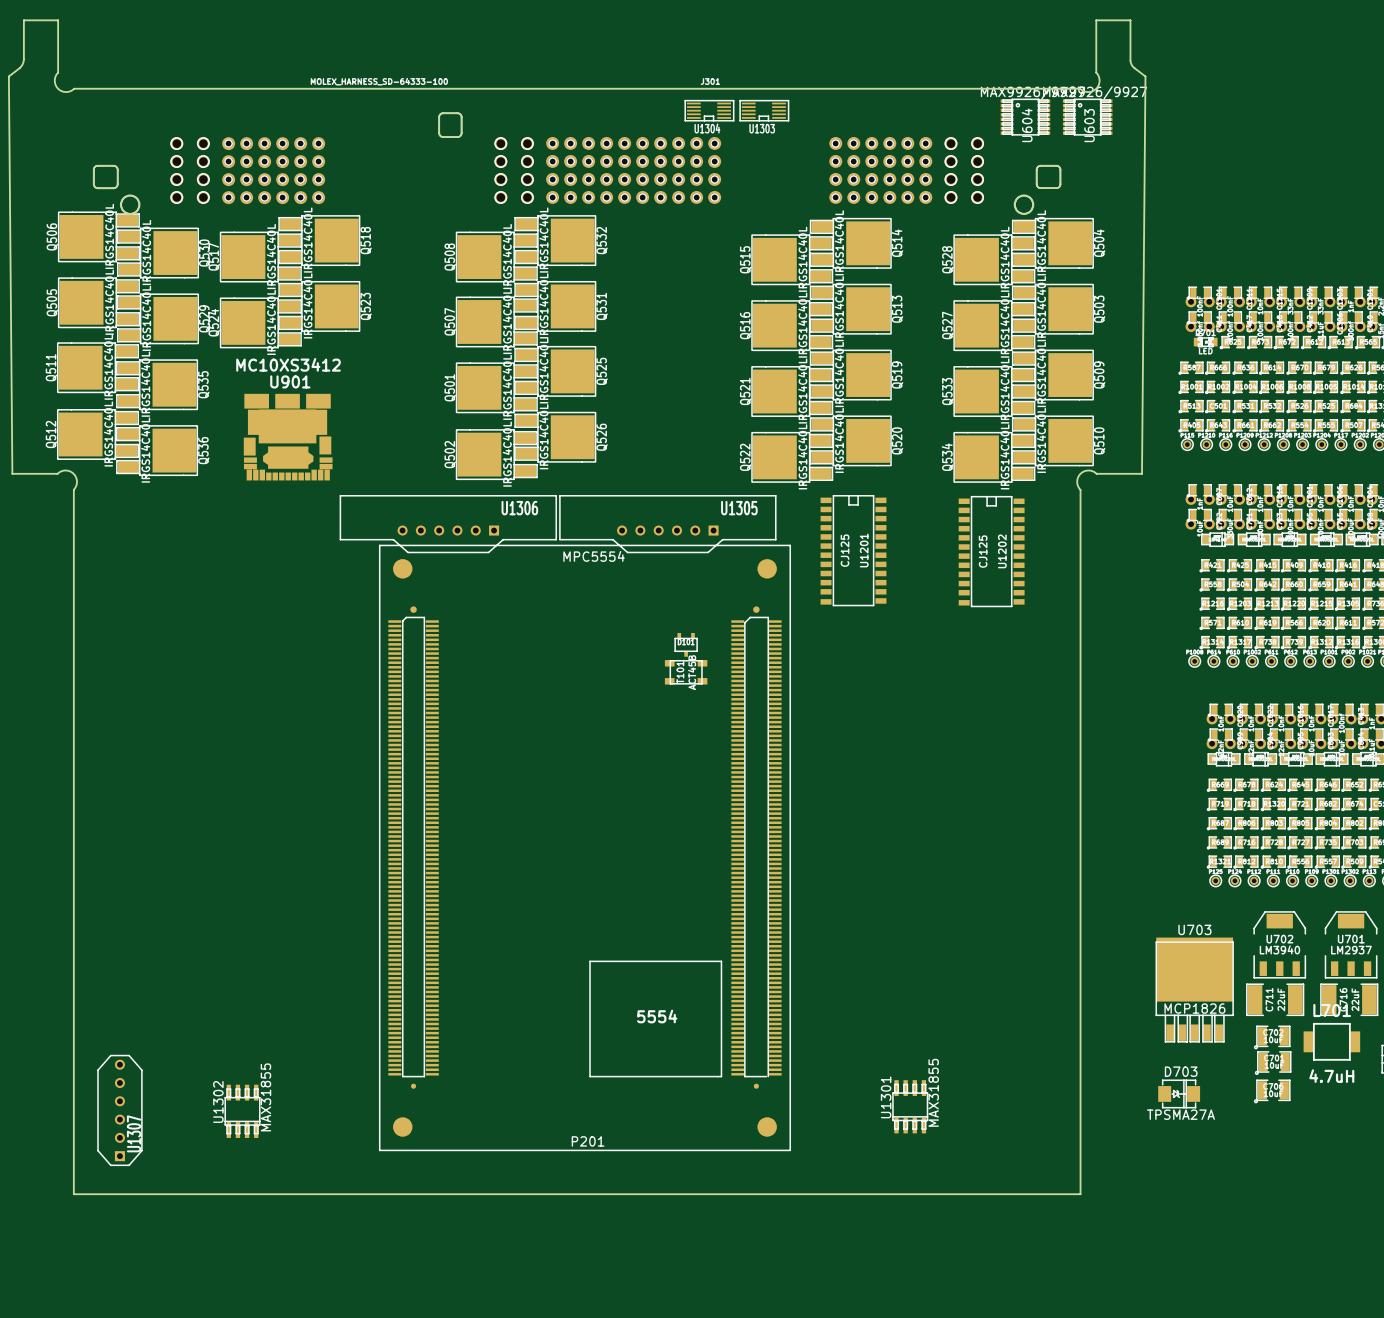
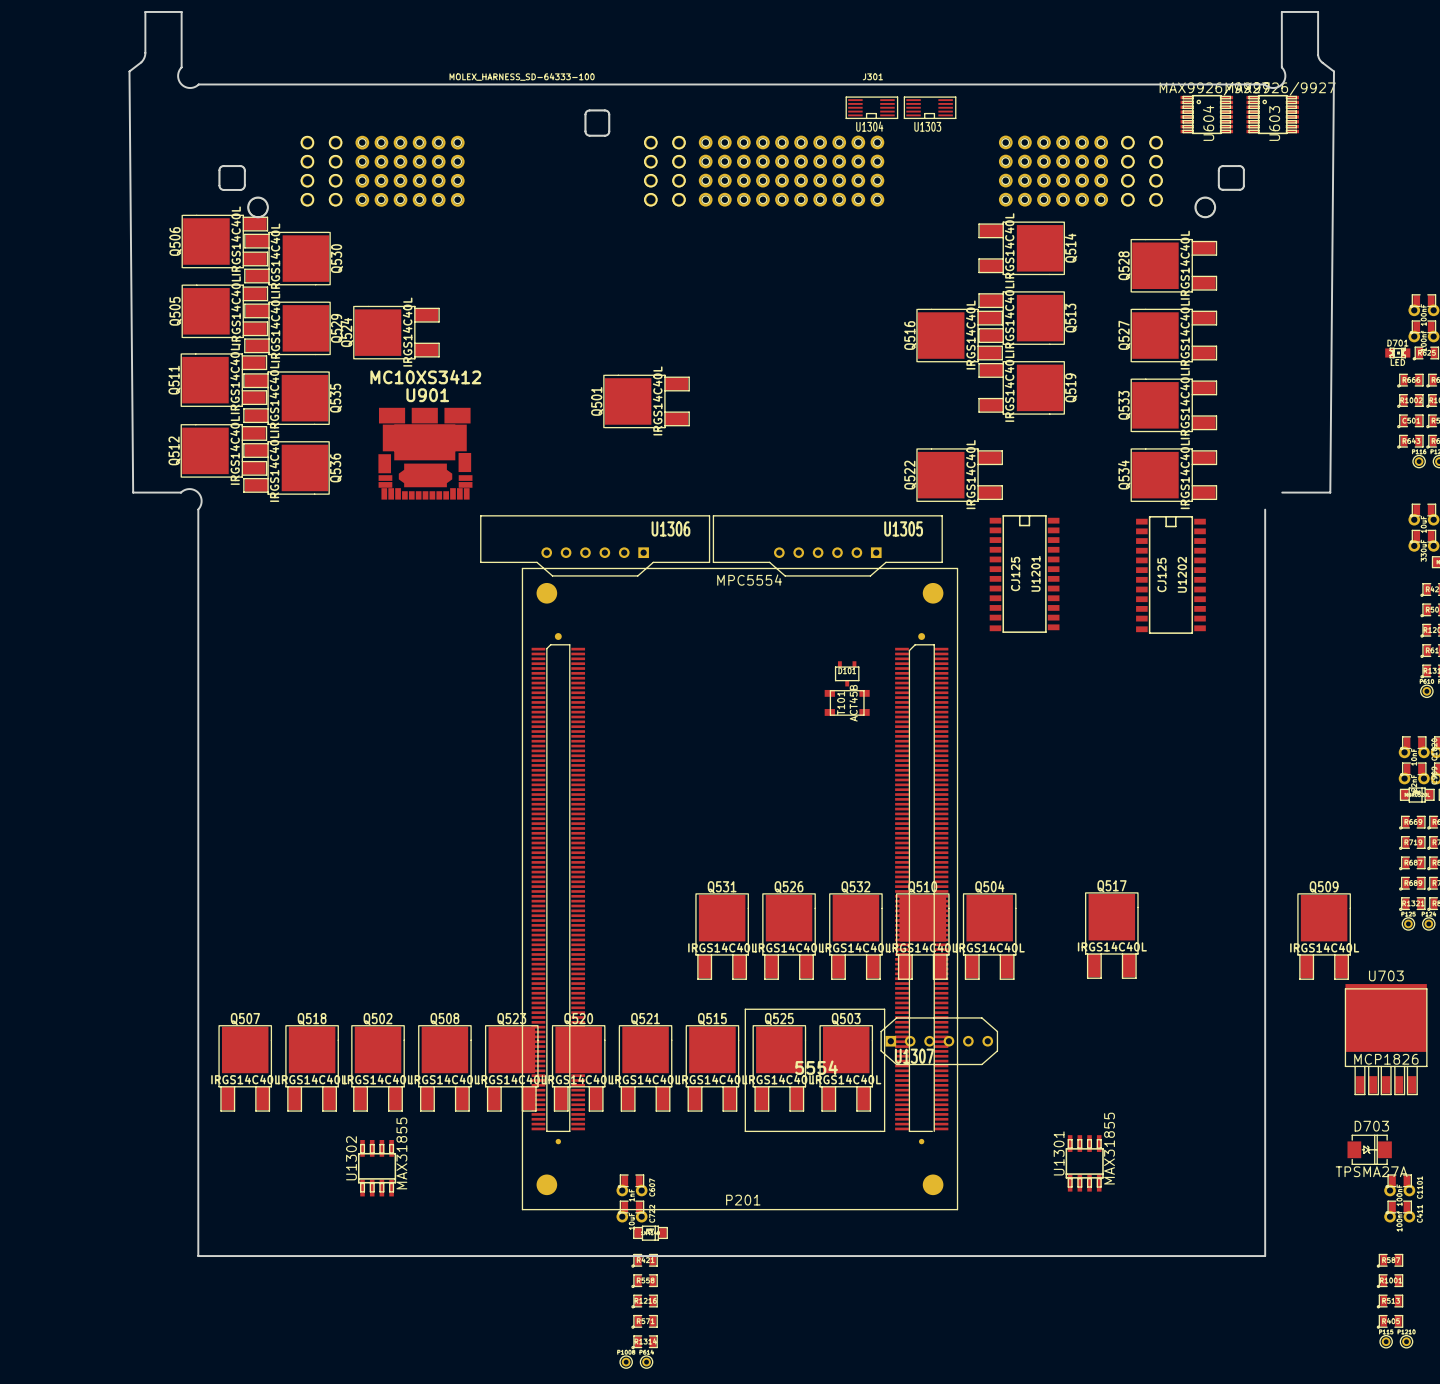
Q518 rotation: 0° (319, 240) -> 90° counterclockwise (312, 1068)
Q518 position: (319, 240) -> (312, 1068)
Q532 rotation: 0° (555, 240) -> 90° counterclockwise (855, 936)
Q532 position: (555, 240) -> (855, 936)
Q504 rotation: 0° (1052, 243) -> 90° counterclockwise (989, 936)
Q504 position: (1052, 243) -> (989, 936)
Q517 rotation: 0° (260, 257) -> 90° clockwise (1111, 935)
Q517 position: (260, 257) -> (1111, 935)
Q508 rotation: 0° (496, 257) -> 90° clockwise (444, 1068)
Q508 position: (496, 257) -> (444, 1068)
Q515 rotation: 0° (792, 259) -> 90° clockwise (712, 1068)
Q515 position: (792, 259) -> (712, 1068)
part position: (1200, 297) -> (1399, 1185)
Q523 rotation: 0° (319, 306) -> 90° counterclockwise (511, 1068)
Q523 position: (319, 306) -> (511, 1068)
Q531 rotation: 0° (555, 306) -> 90° counterclockwise (722, 936)
Q531 position: (555, 306) -> (722, 936)
Q503 rotation: 0° (1052, 309) -> 90° counterclockwise (846, 1068)
Q503 position: (1052, 309) -> (846, 1068)
Q507 rotation: 0° (496, 321) -> 90° clockwise (245, 1068)
Q507 position: (496, 321) -> (245, 1068)
part position: (1200, 321) -> (1399, 1211)
part position: (1191, 368) -> (1390, 1260)
Q525 rotation: 0° (555, 371) -> 90° counterclockwise (779, 1068)
Q525 position: (555, 371) -> (779, 1068)
Q509 rotation: 0° (1052, 375) -> 90° counterclockwise (1324, 936)
Q509 position: (1052, 375) -> (1324, 936)
part position: (1191, 387) -> (1390, 1281)
Q521 rotation: 0° (792, 391) -> 90° clockwise (645, 1068)
Q521 position: (792, 391) -> (645, 1068)
part position: (1191, 406) -> (1390, 1301)
part position: (1191, 425) -> (1390, 1321)
Q526 rotation: 0° (555, 437) -> 90° counterclockwise (789, 936)
Q526 position: (555, 437) -> (789, 936)
Q520 rotation: 0° (850, 440) -> 90° counterclockwise (578, 1068)
Q520 position: (850, 440) -> (578, 1068)
Q510 rotation: 0° (1052, 440) -> 90° counterclockwise (922, 936)
Q510 position: (1052, 440) -> (922, 936)
part position: (1187, 444) -> (1386, 1341)
part position: (1206, 444) -> (1406, 1341)
Q502 rotation: 0° (496, 454) -> 90° clockwise (378, 1068)
Q502 position: (496, 454) -> (378, 1068)
board edge: (1096, 473) (1088, 470) (1080, 473) (1077, 481) (1080, 489) -> none
part position: (1200, 494) -> (631, 1185)
part position: (1200, 519) -> (631, 1211)
part position: (1217, 539) -> (650, 1233)
part position: (1212, 565) -> (644, 1260)
part position: (1212, 584) -> (644, 1281)
part position: (1212, 604) -> (644, 1301)
part position: (1212, 623) -> (644, 1321)
part position: (1212, 642) -> (644, 1342)
part position: (1194, 661) -> (626, 1362)
part position: (1213, 661) -> (646, 1362)
U1307 rotation: 0° (119, 1110) -> 90° clockwise (939, 1041)
U1307 position: (119, 1110) -> (939, 1041)

